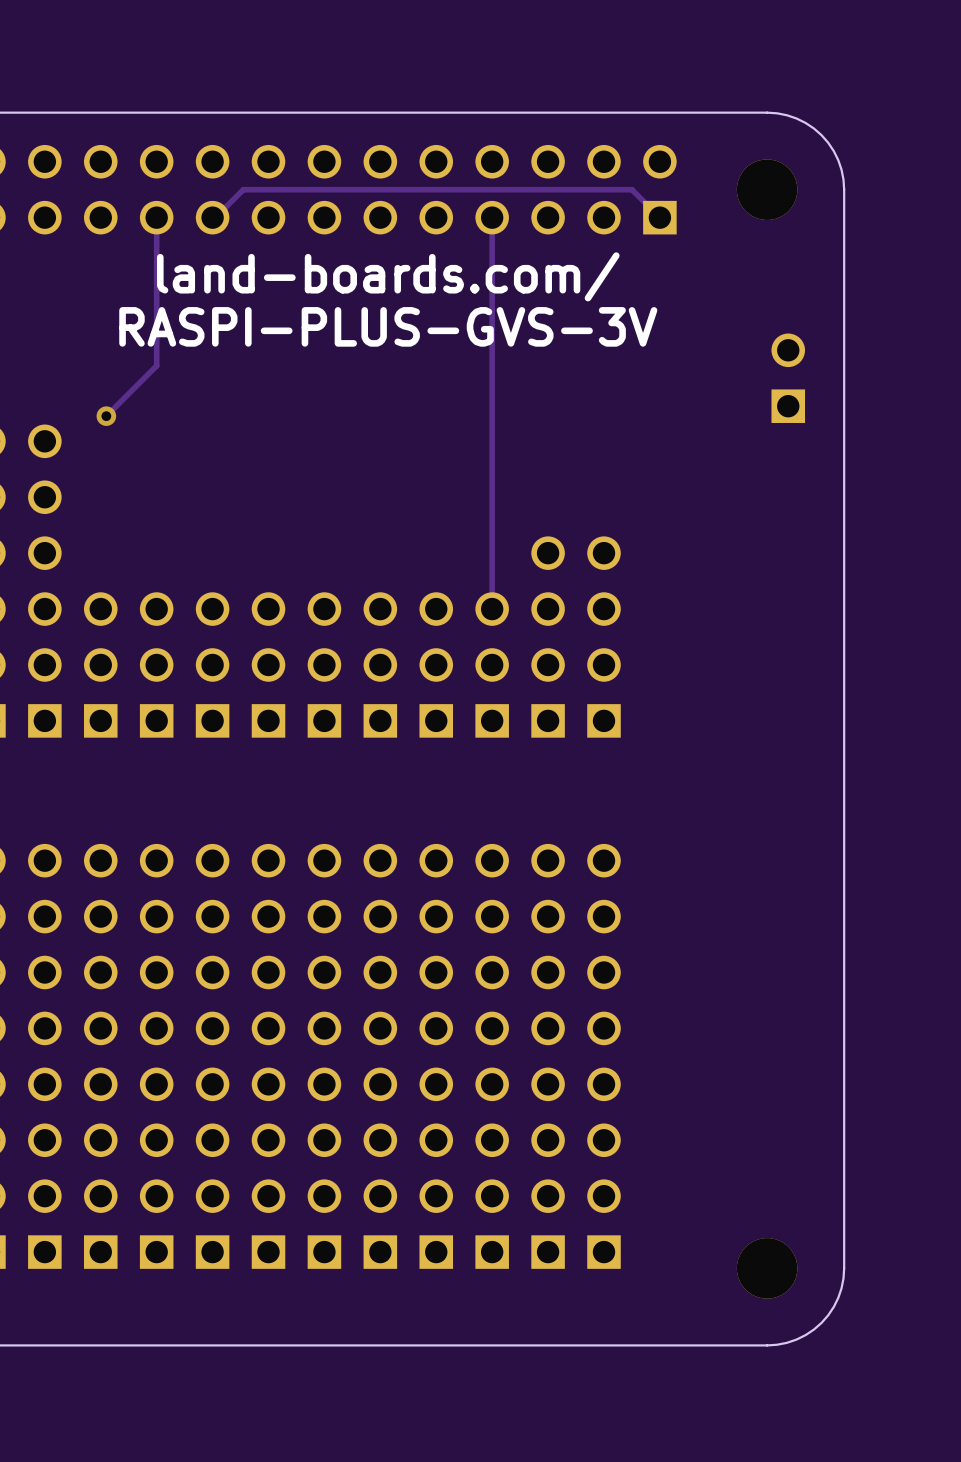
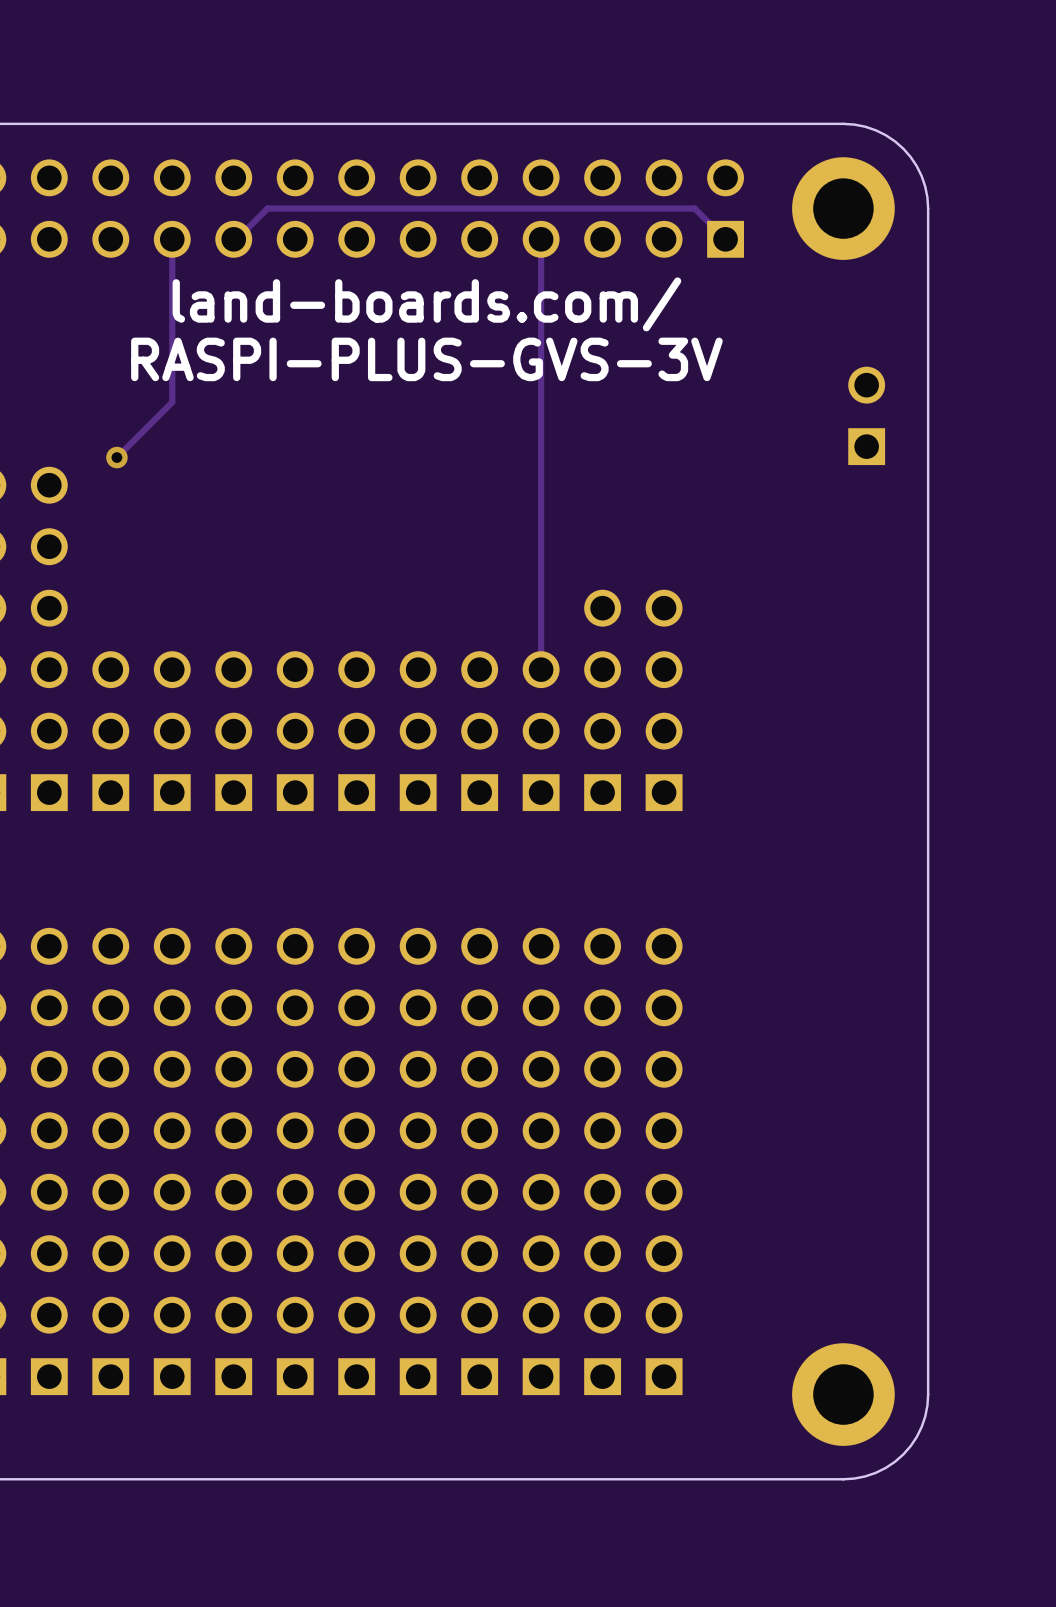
part footprint: [736, 159, 798, 220] -> [792, 157, 895, 260]
part footprint: [736, 1238, 798, 1299] -> [792, 1343, 895, 1446]

